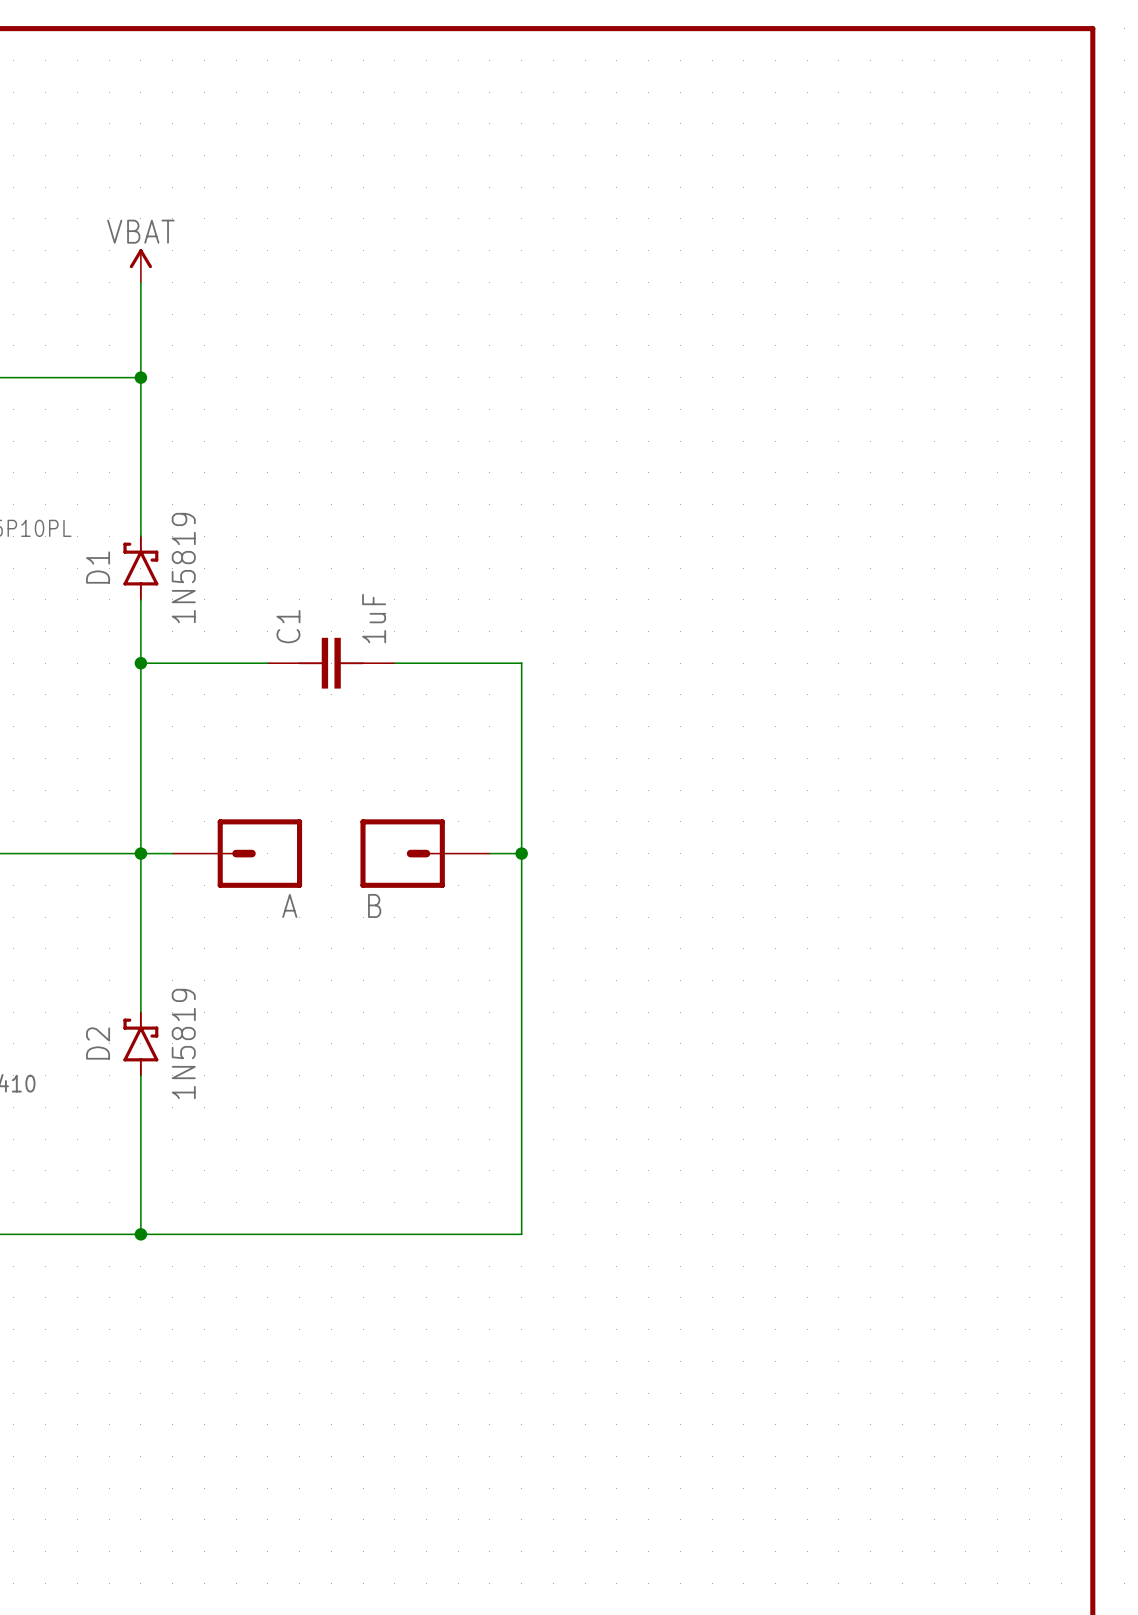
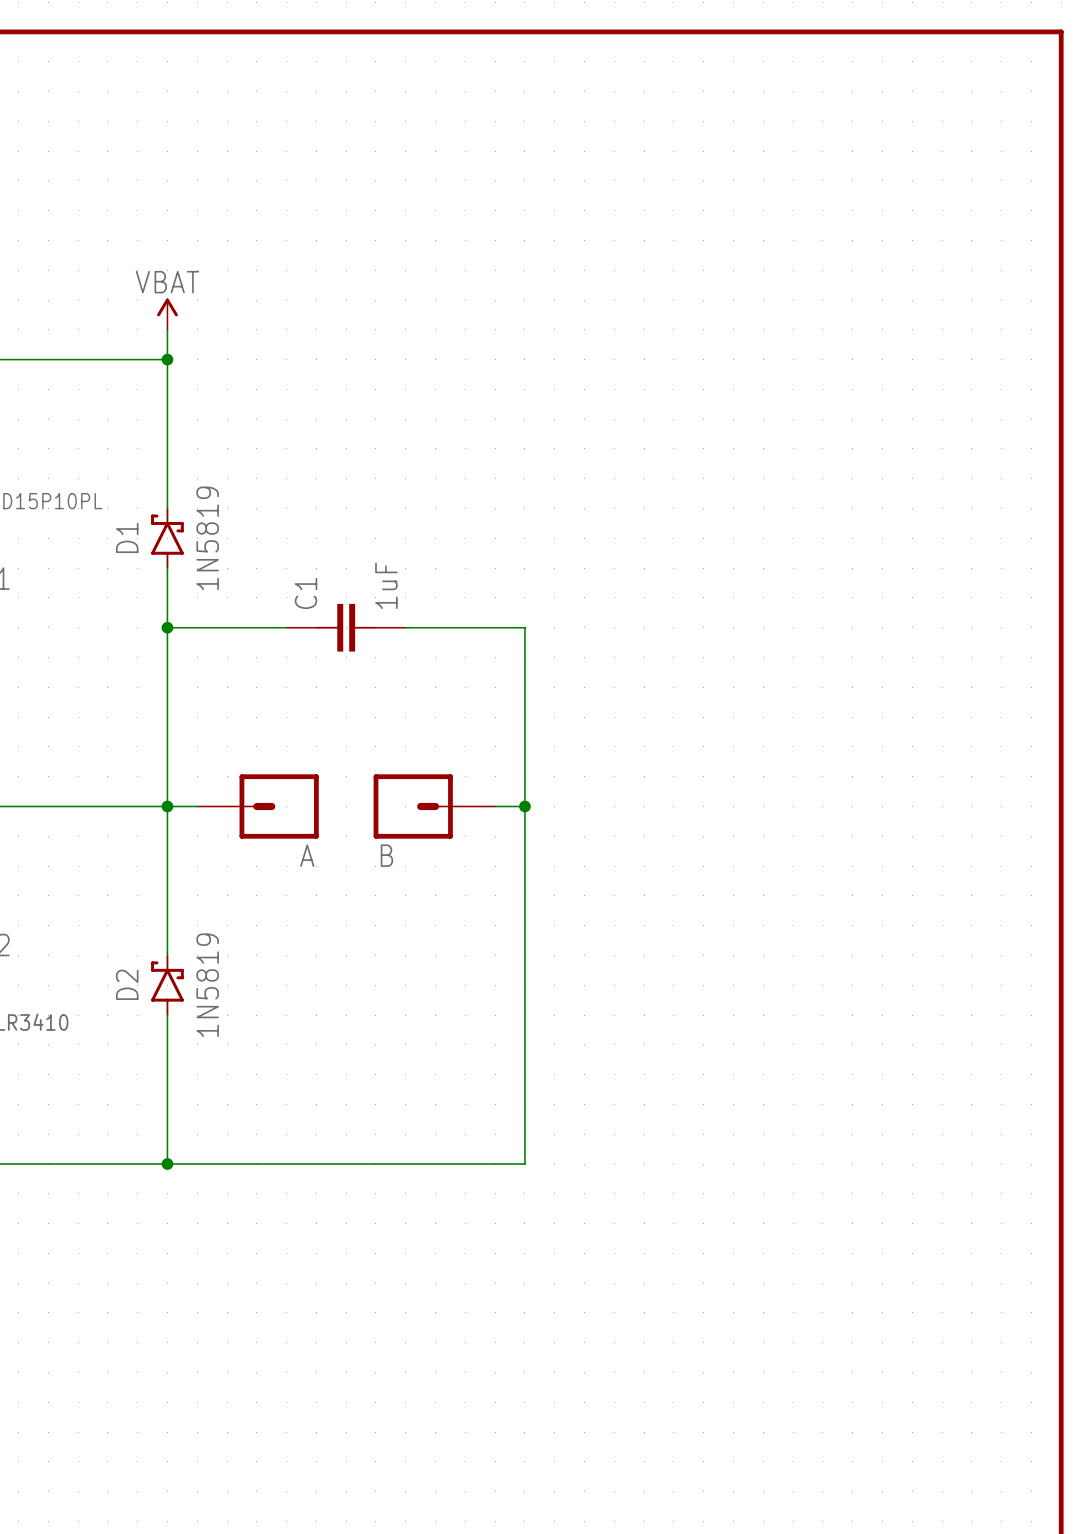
power symbol position: VBAT (140, 265) -> VBAT (167, 314)

